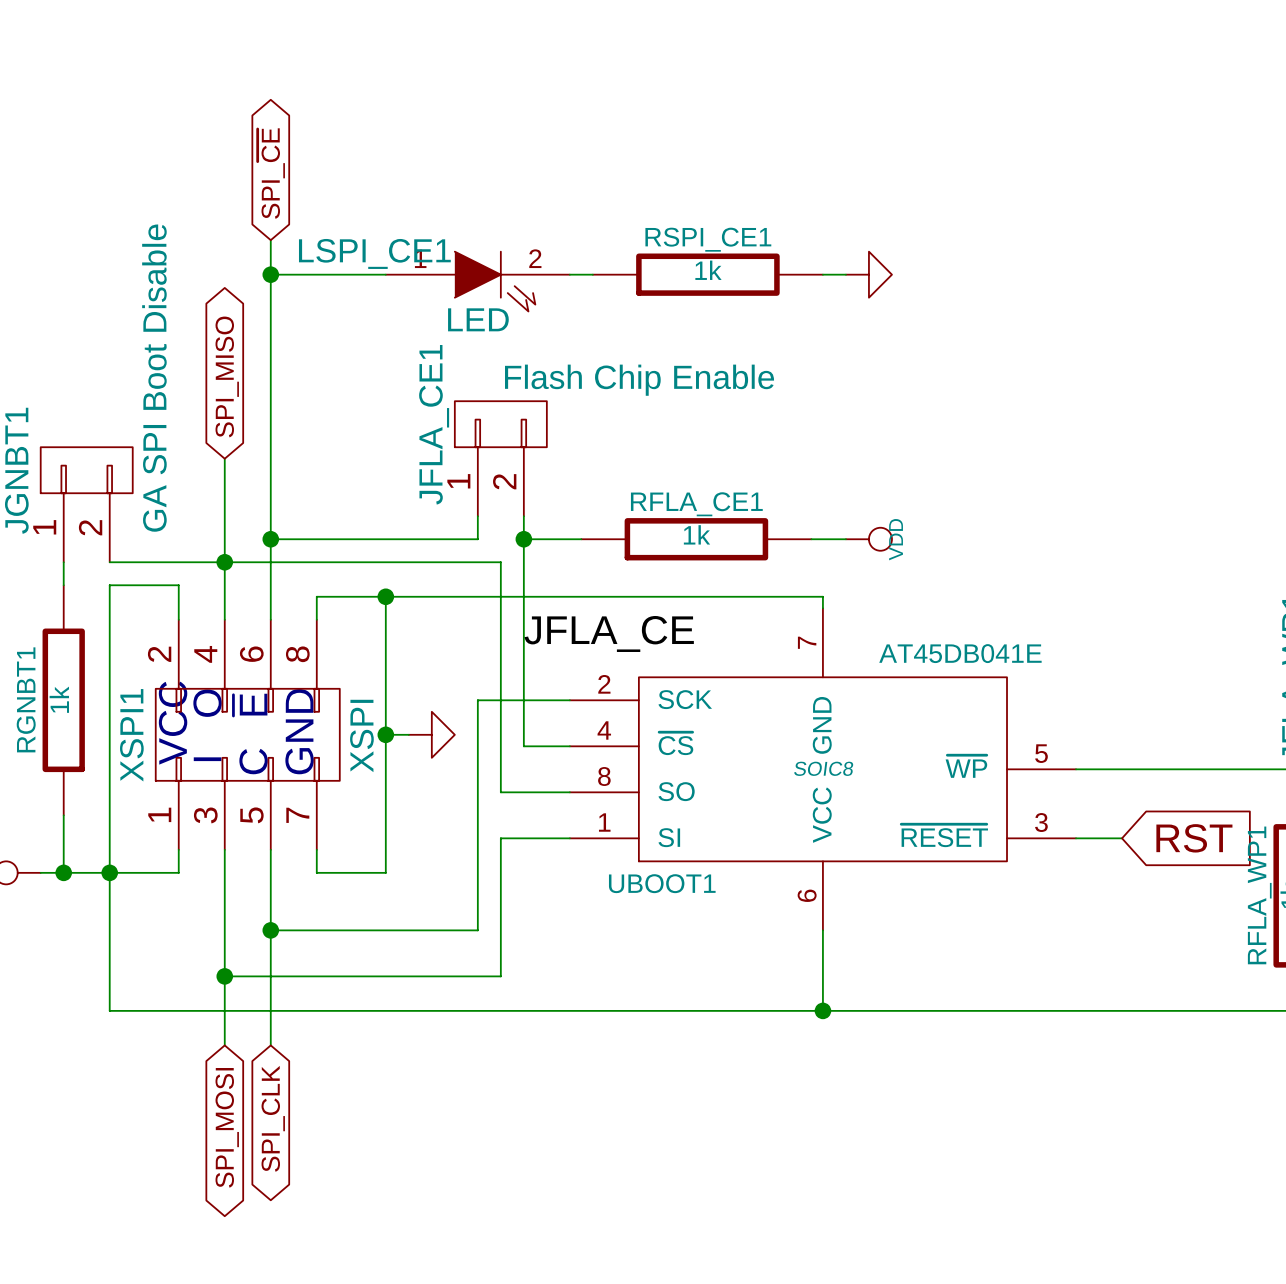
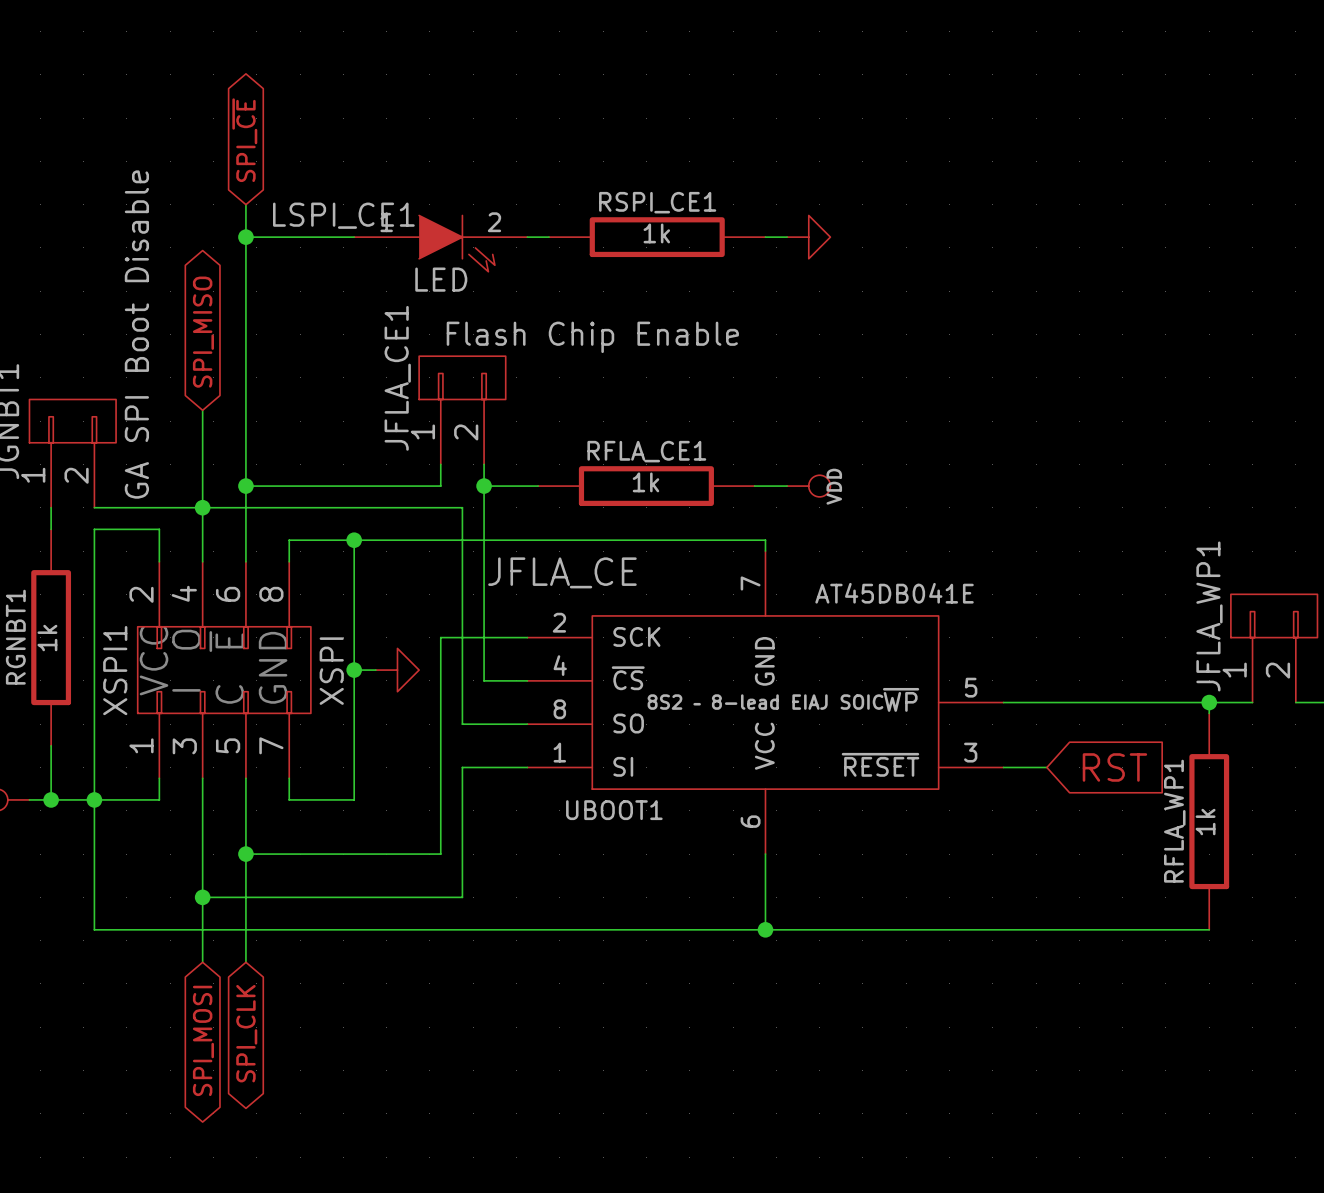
UBOOT1 text: SOIC8 (823, 768) -> none
UBOOT1 text: none -> 8S2 – 8-lead EIAJ SOIC (765, 702)

